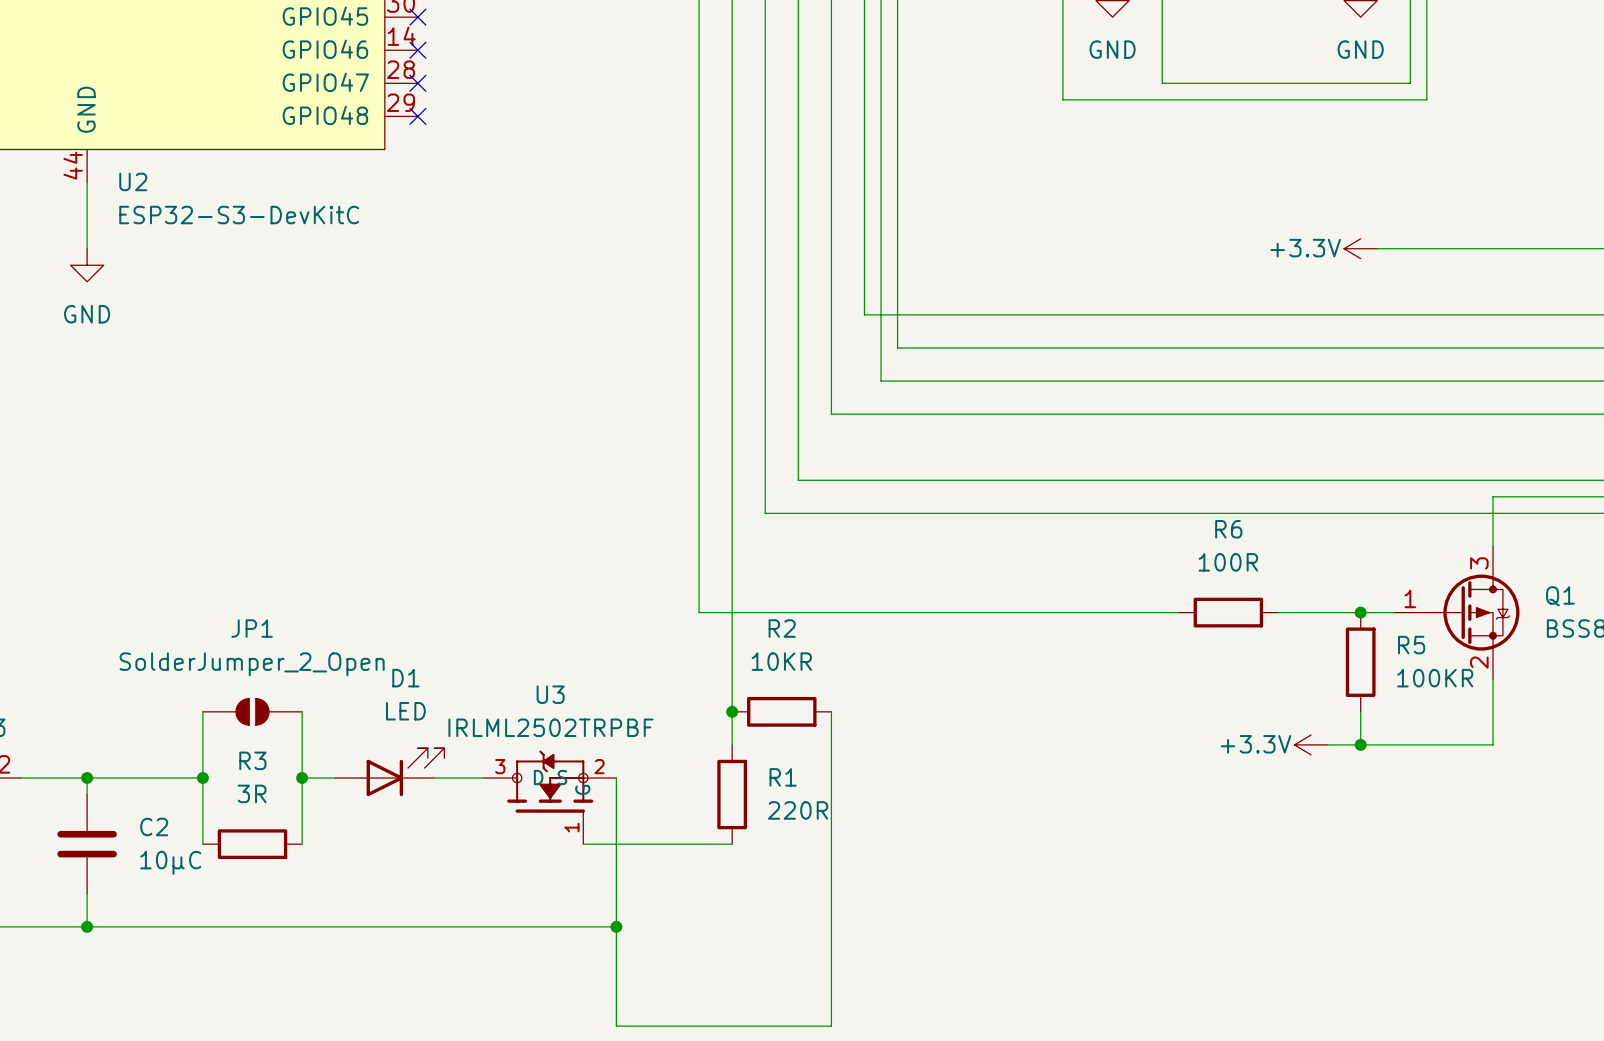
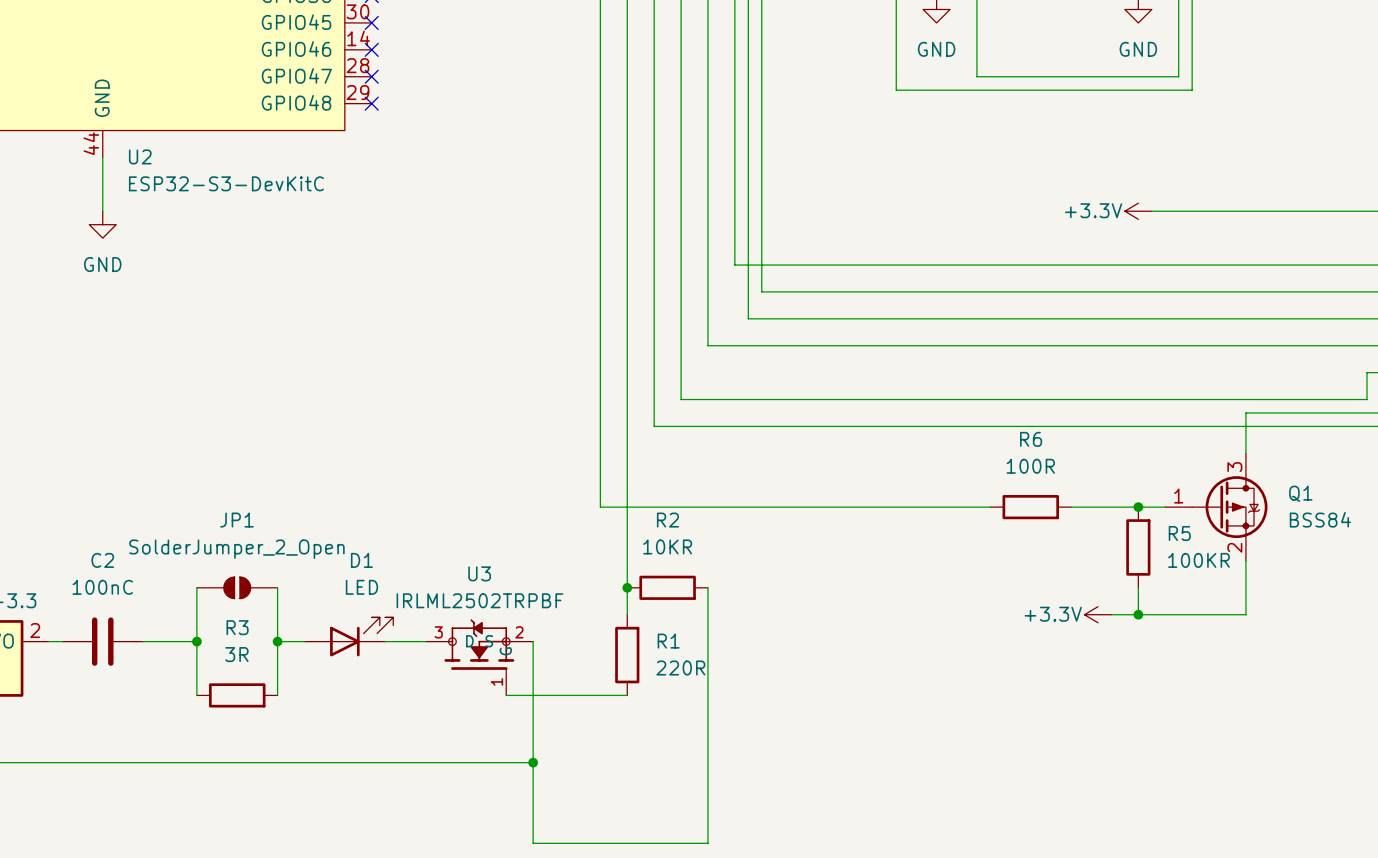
wire: (87, 778) (87, 794) -> none
junction: (87, 778) -> none
C2 name position: C2 (154, 827) -> C2 (102, 560)
C2 rotation: 0° (87, 844) -> 90° clockwise (102, 641)
C2 position: (87, 844) -> (102, 641)
C2 value: 10µC (170, 862) -> 100nC (102, 587)
wire: (87, 893) (87, 926) -> none
junction: (87, 926) -> none

